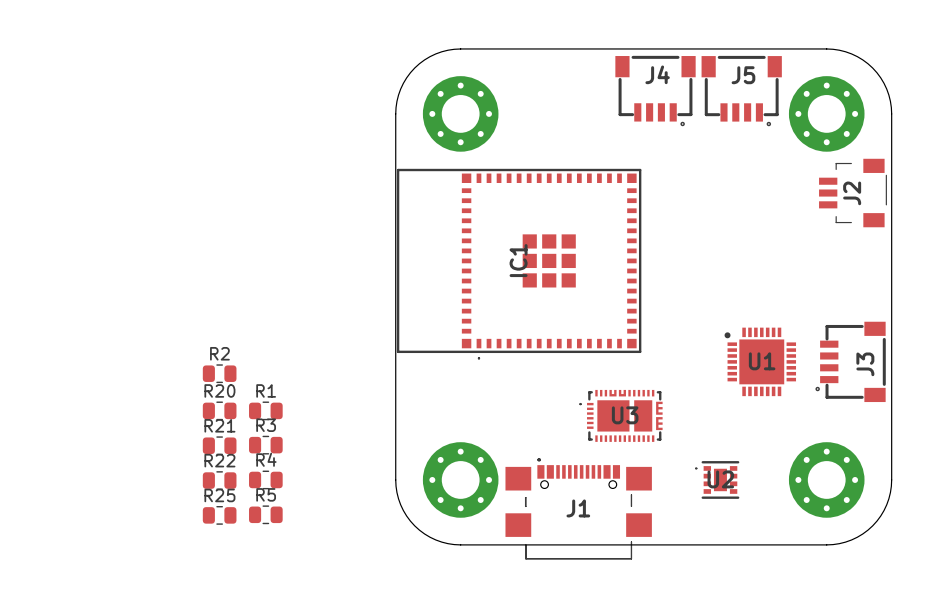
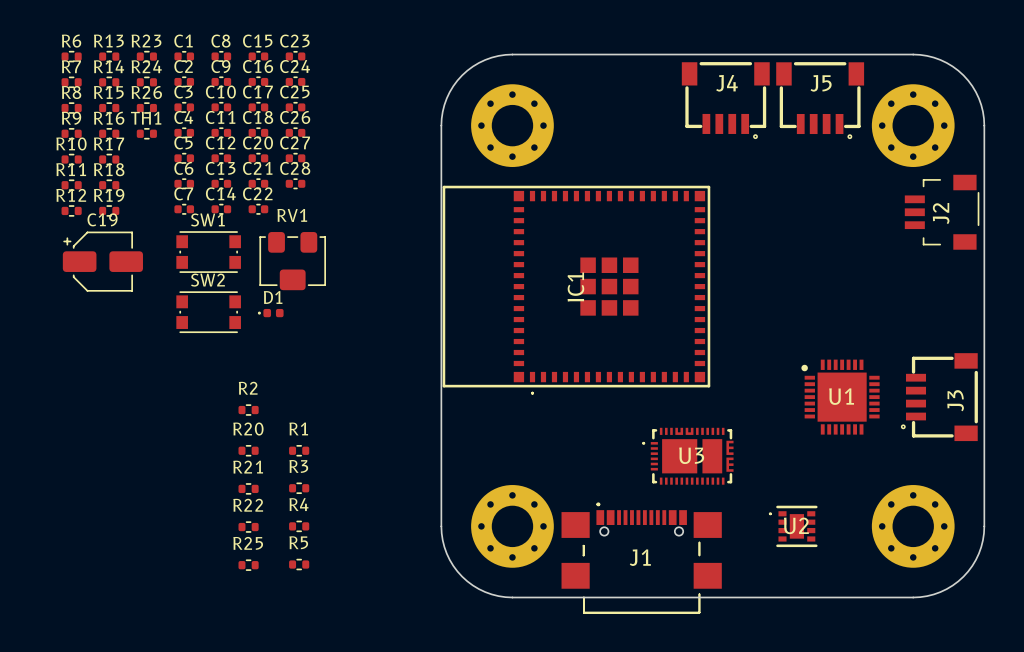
R6: none -> (71, 56)
R13: none -> (109, 56)
R23: none -> (146, 56)
C1: none -> (184, 56)
C8: none -> (221, 56)
C15: none -> (258, 56)
C23: none -> (295, 56)
R7: none -> (71, 82)
R14: none -> (109, 82)
R24: none -> (146, 82)
C2: none -> (184, 81)
C9: none -> (221, 81)
C16: none -> (258, 81)
C24: none -> (295, 81)
R8: none -> (71, 108)
R15: none -> (109, 108)
R26: none -> (146, 108)
C3: none -> (184, 107)
C10: none -> (221, 107)
C17: none -> (258, 107)
C25: none -> (295, 107)
C4: none -> (184, 132)
C11: none -> (221, 132)
C18: none -> (258, 132)
C26: none -> (295, 132)
R9: none -> (71, 133)
R16: none -> (109, 133)
TH1: none -> (146, 133)
C5: none -> (184, 158)
C12: none -> (221, 158)
C20: none -> (258, 158)
C27: none -> (295, 158)
R10: none -> (71, 159)
R17: none -> (109, 159)
C6: none -> (184, 183)
C13: none -> (221, 183)
C21: none -> (258, 183)
C28: none -> (295, 183)
R11: none -> (71, 185)
R18: none -> (109, 185)
C7: none -> (184, 209)
C14: none -> (221, 209)
C22: none -> (258, 209)
R12: none -> (71, 210)
R19: none -> (109, 210)
SW1: none -> (208, 252)
RV1: none -> (292, 261)
C19: none -> (102, 261)
SW2: none -> (208, 312)
D1: none -> (270, 313)
R2 footprint: [202, 364, 237, 384] -> [238, 404, 259, 416]
R20 footprint: [202, 401, 237, 421] -> [238, 445, 259, 457]
R1 footprint: [249, 401, 283, 421] -> [289, 445, 310, 457]
R3 footprint: [249, 435, 283, 455] -> [289, 482, 310, 494]
R21 footprint: [202, 436, 237, 456] -> [238, 483, 259, 495]
R4 footprint: [249, 470, 283, 490] -> [289, 520, 310, 533]
R22 footprint: [202, 471, 237, 490] -> [238, 521, 259, 533]
R5 footprint: [249, 505, 283, 525] -> [289, 558, 310, 571]
R25 footprint: [202, 506, 237, 525] -> [238, 559, 259, 571]

